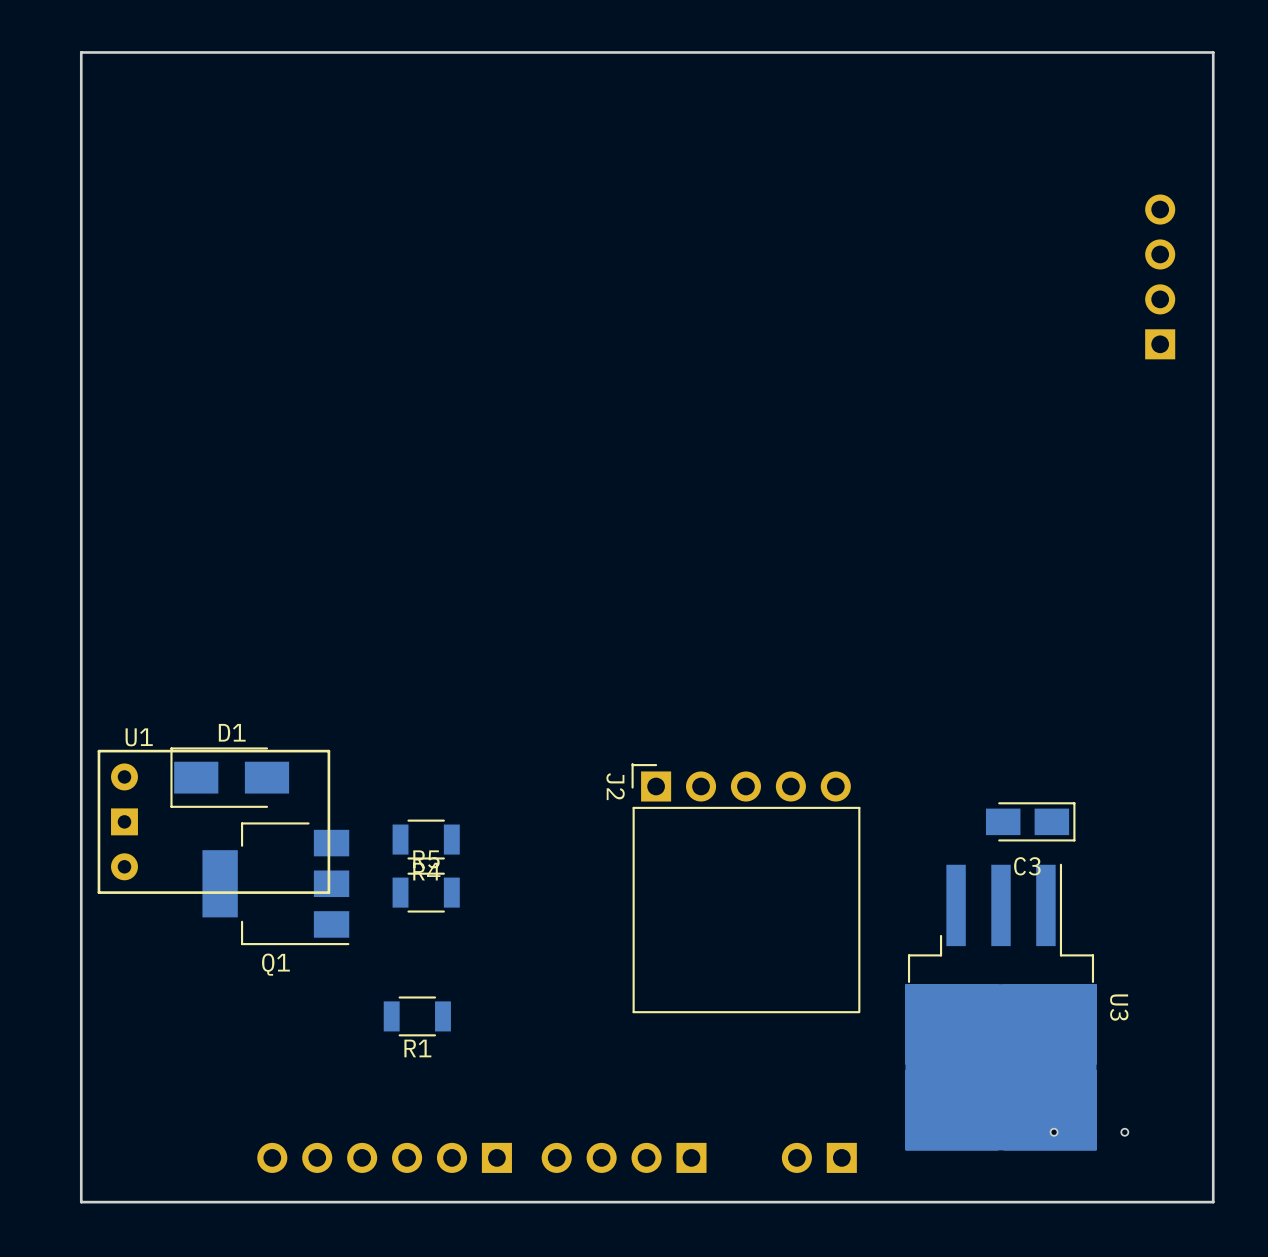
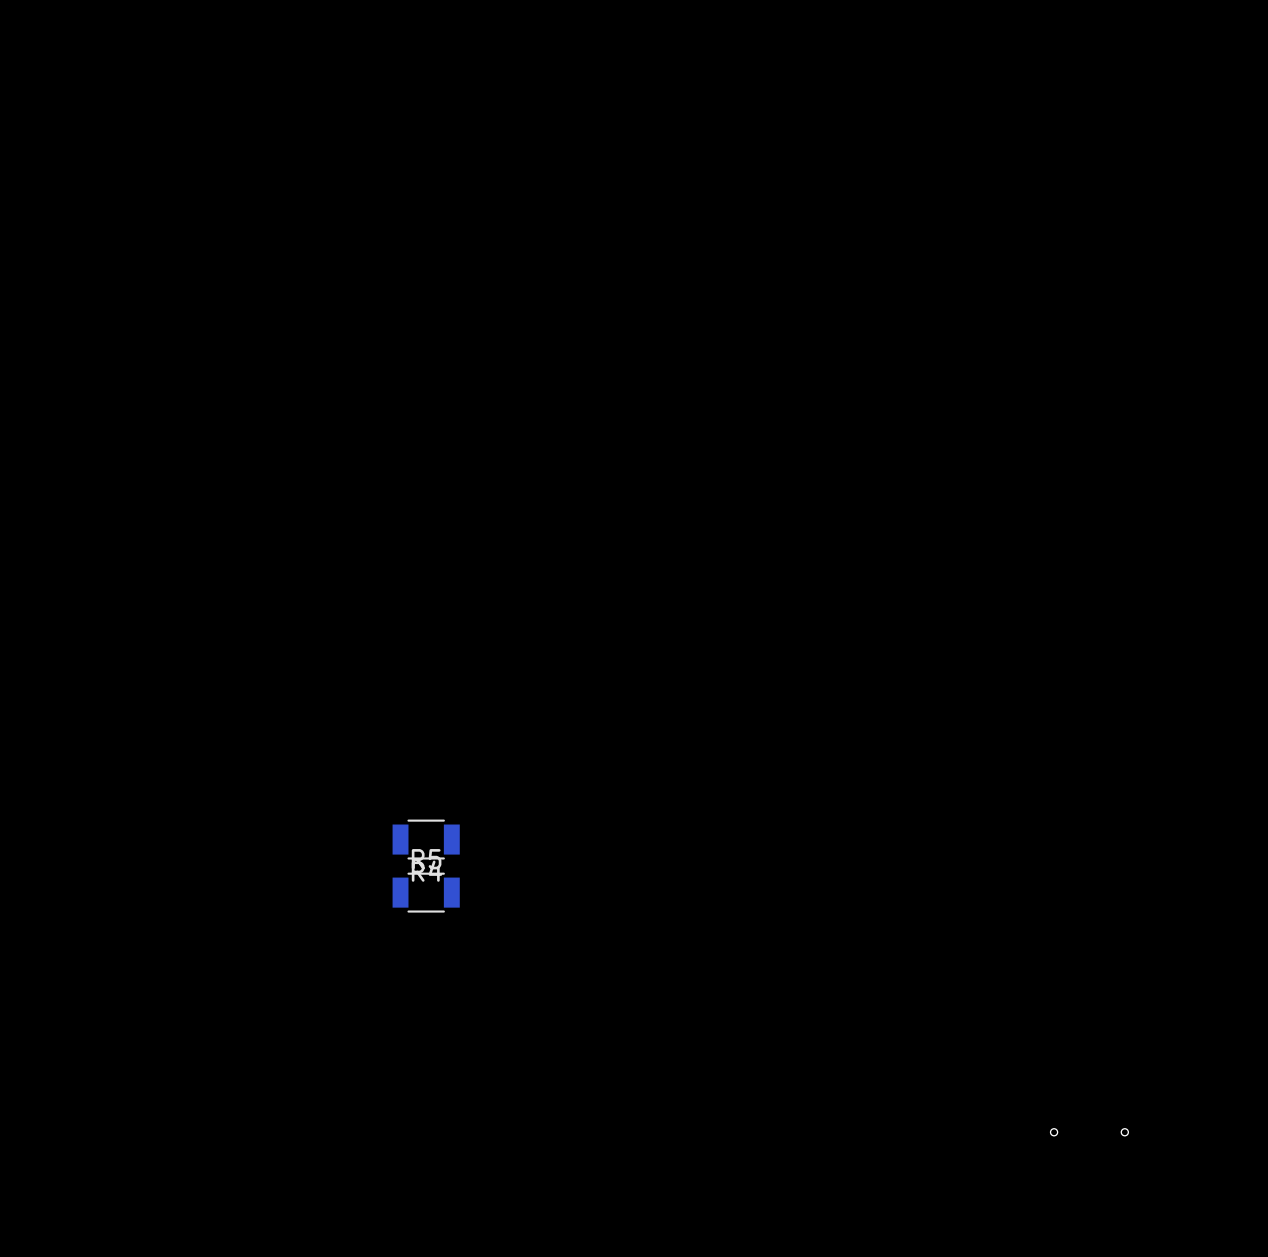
board edge: (1213, 52) (81, 52) (81, 1202) (1213, 1202) (1213, 52) -> none
part: (1160, 276) -> none
D1: (229, 777) -> none
U1: (213, 821) -> none
C3: (1030, 821) -> none
Q1: (275, 883) -> none
J2: (745, 888) -> none
U3: (1001, 1007) -> none
R1: (417, 1016) -> none
part: (384, 1157) -> none
part: (624, 1157) -> none
part: (819, 1157) -> none

